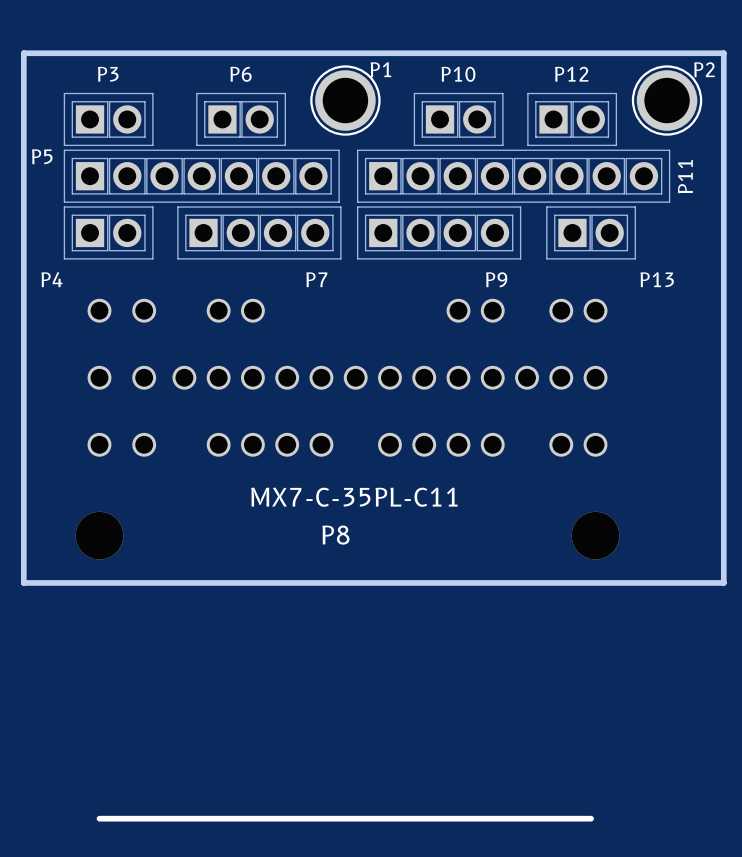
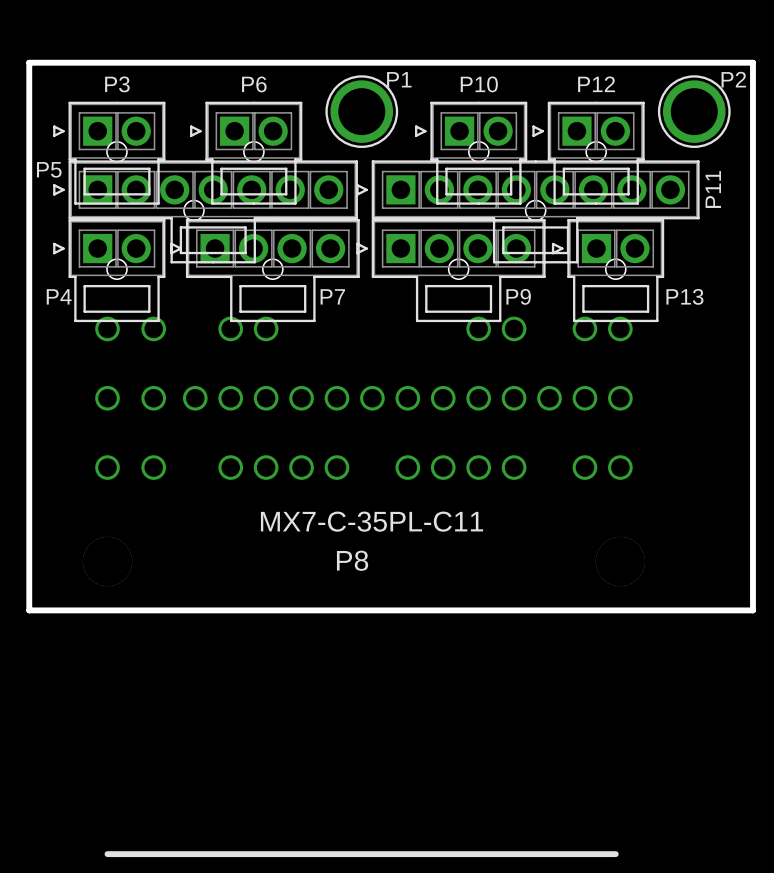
P3 footprint: [64, 93, 154, 146] -> [53, 101, 166, 205]
P6 footprint: [196, 93, 286, 146] -> [190, 101, 303, 205]
P10 footprint: [414, 93, 504, 146] -> [414, 101, 528, 205]
P12 footprint: [527, 93, 617, 146] -> [532, 101, 645, 205]
P5 footprint: [64, 149, 340, 203] -> [53, 160, 358, 264]
P11 footprint: [357, 149, 670, 203] -> [356, 160, 700, 264]
P4 footprint: [64, 206, 154, 260] -> [53, 219, 166, 323]
P7 footprint: [177, 206, 342, 260] -> [170, 219, 360, 323]
P9 footprint: [357, 206, 521, 260] -> [356, 219, 546, 323]
P13 footprint: [546, 206, 636, 260] -> [551, 219, 665, 323]

